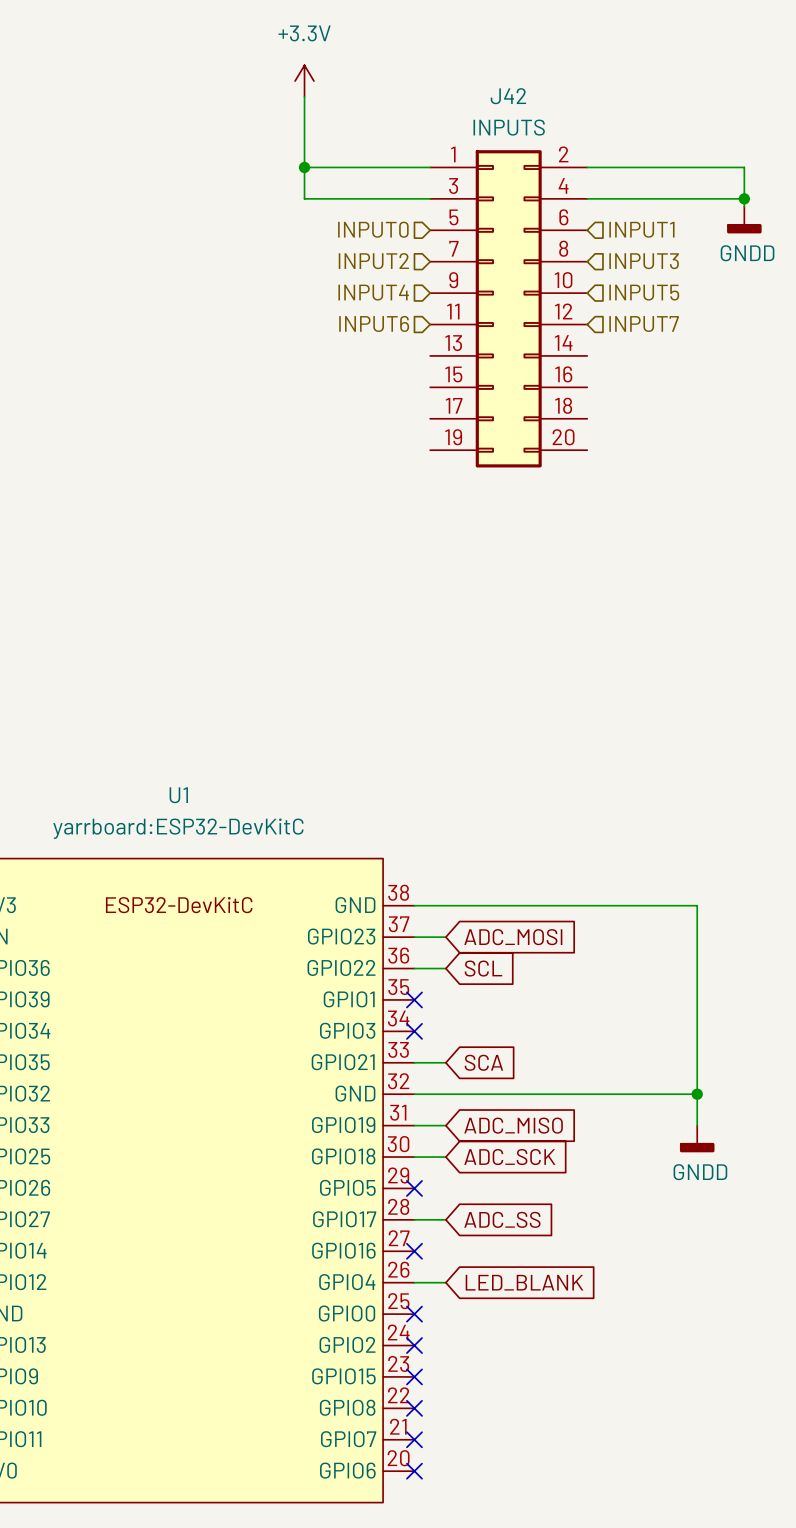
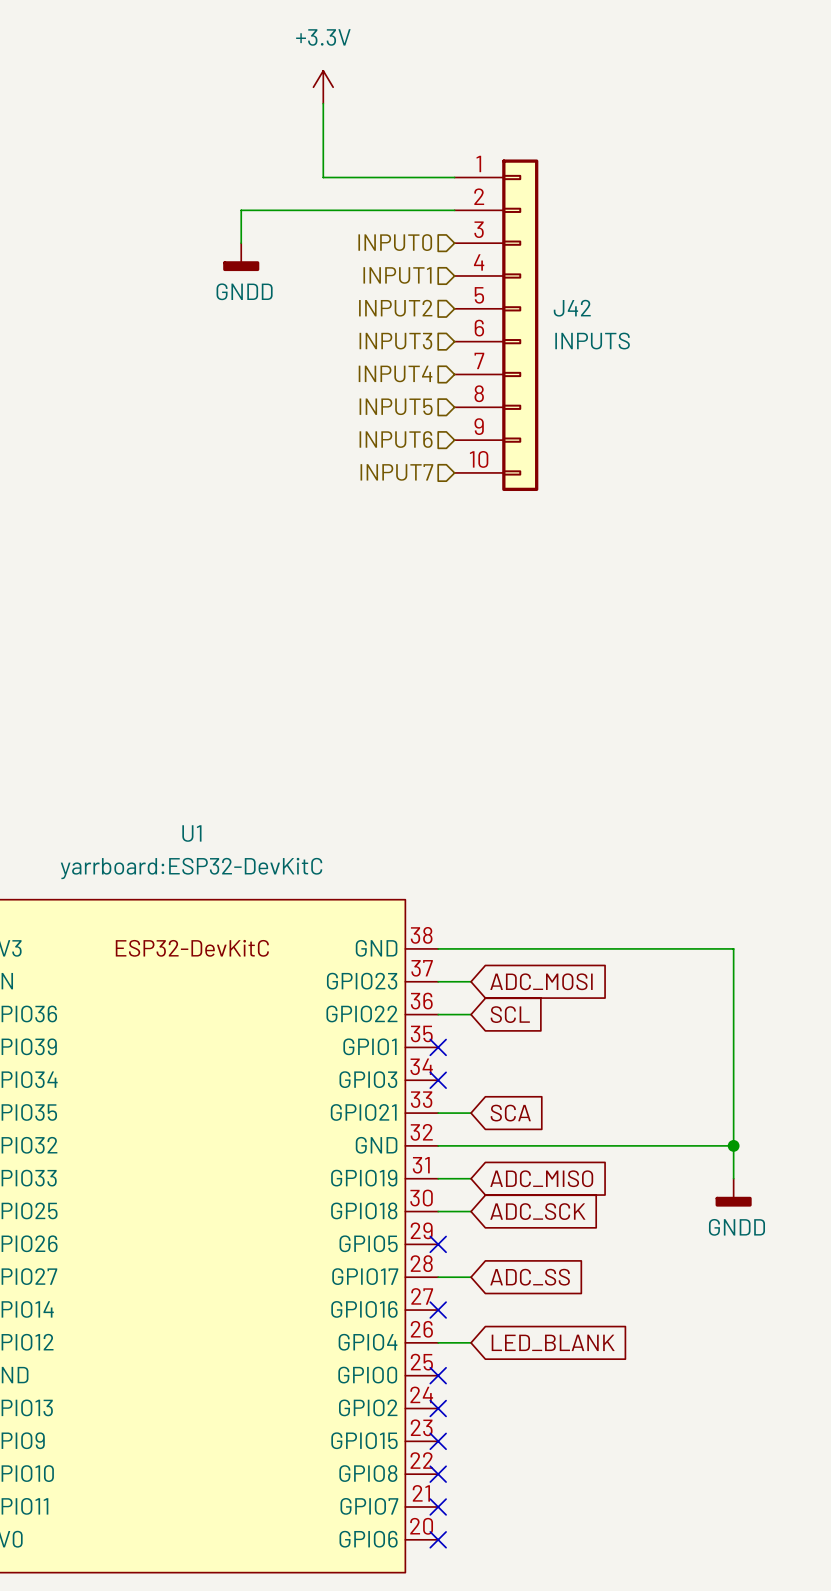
J42 name position: J42 (508, 96) -> J42 (572, 308)
J42 value position: INPUTS (509, 127) -> INPUTS (592, 341)
J42 symbol: [430, 150, 588, 468] -> [454, 159, 539, 492]
wire: (304, 167) (304, 198) -> (241, 243) (241, 210) (323, 210)
junction: (304, 167) -> none
wire: (587, 167) (744, 167) (744, 206) -> none
wire: (587, 198) (744, 198) -> none
junction: (744, 198) -> none
power symbol: GNDD (744, 220) -> none
hierarchical label: INPUT1 (641, 229) -> none
power symbol: none -> GNDD (241, 257)
hierarchical label: INPUT2 (373, 261) -> INPUT1 (397, 275)
hierarchical label: INPUT3 (644, 261) -> none
hierarchical label: INPUT4 (373, 292) -> INPUT2 (395, 308)
hierarchical label rotation: 0° (644, 292) -> 180° (396, 406)
hierarchical label position: INPUT5 (644, 292) -> INPUT5 (396, 406)
hierarchical label: INPUT6 (374, 323) -> INPUT3 (395, 341)
hierarchical label rotation: 0° (644, 324) -> 180° (396, 472)
hierarchical label position: INPUT7 (644, 324) -> INPUT7 (396, 472)
hierarchical label: none -> INPUT4 (395, 373)
hierarchical label: none -> INPUT6 (396, 439)

